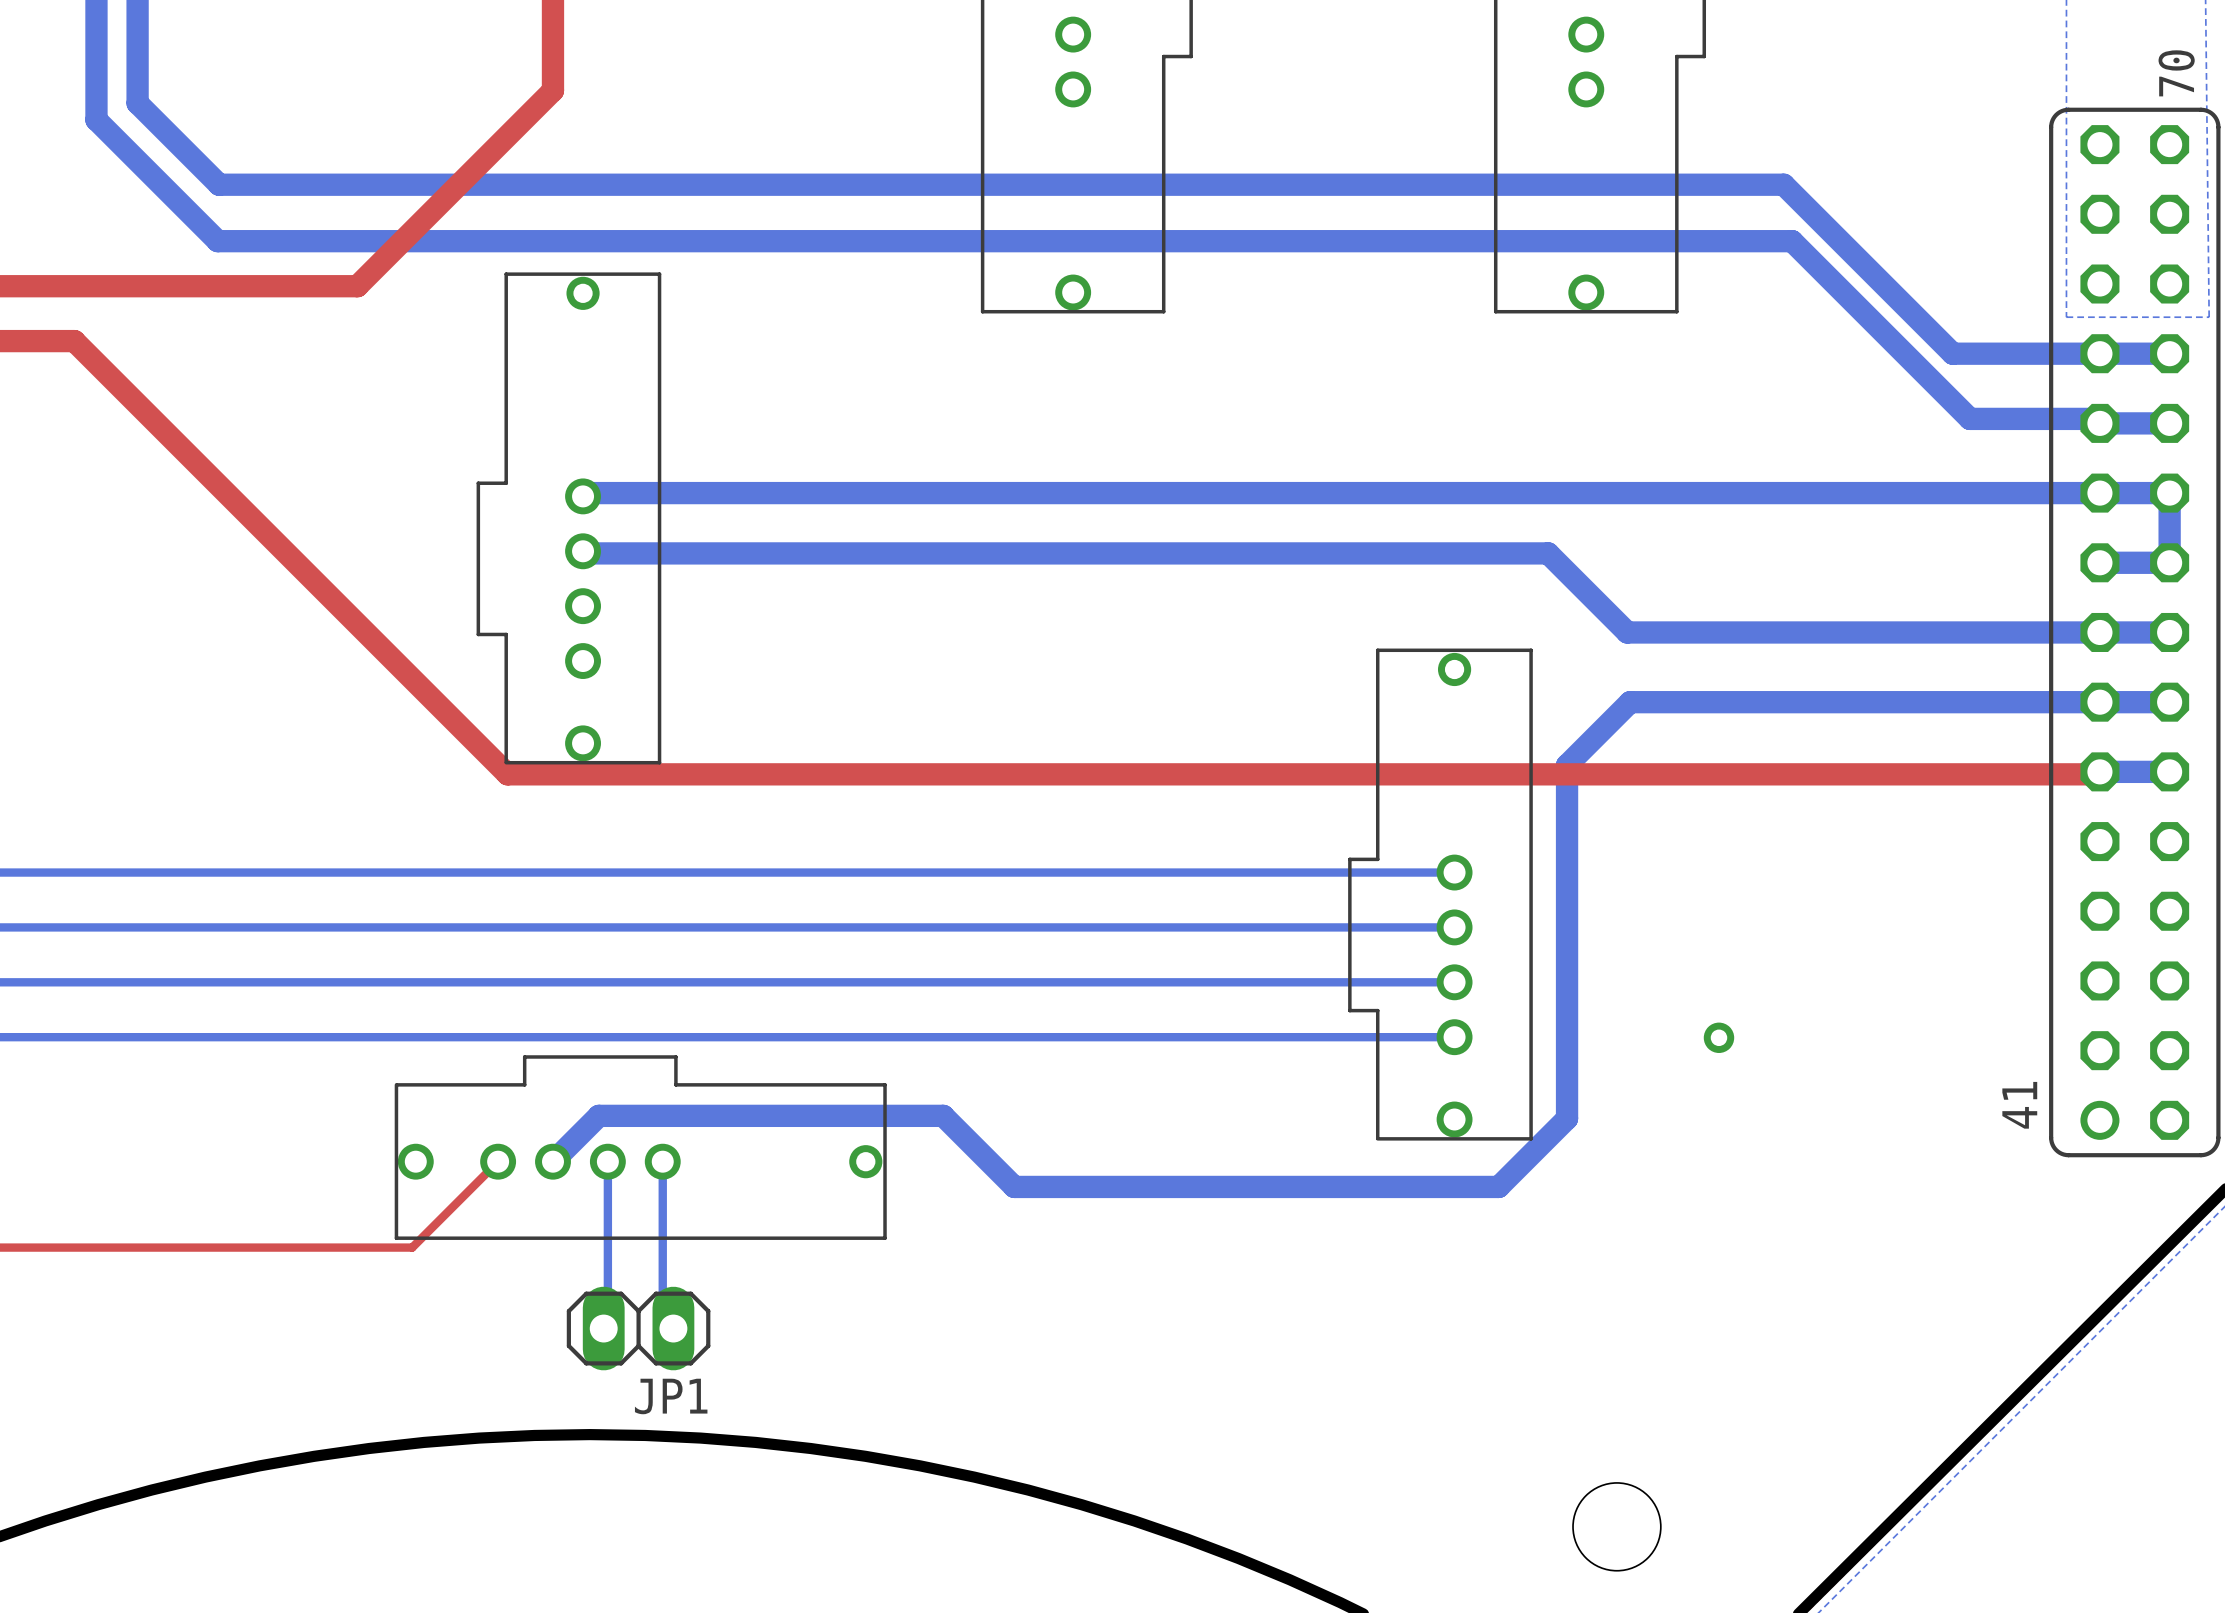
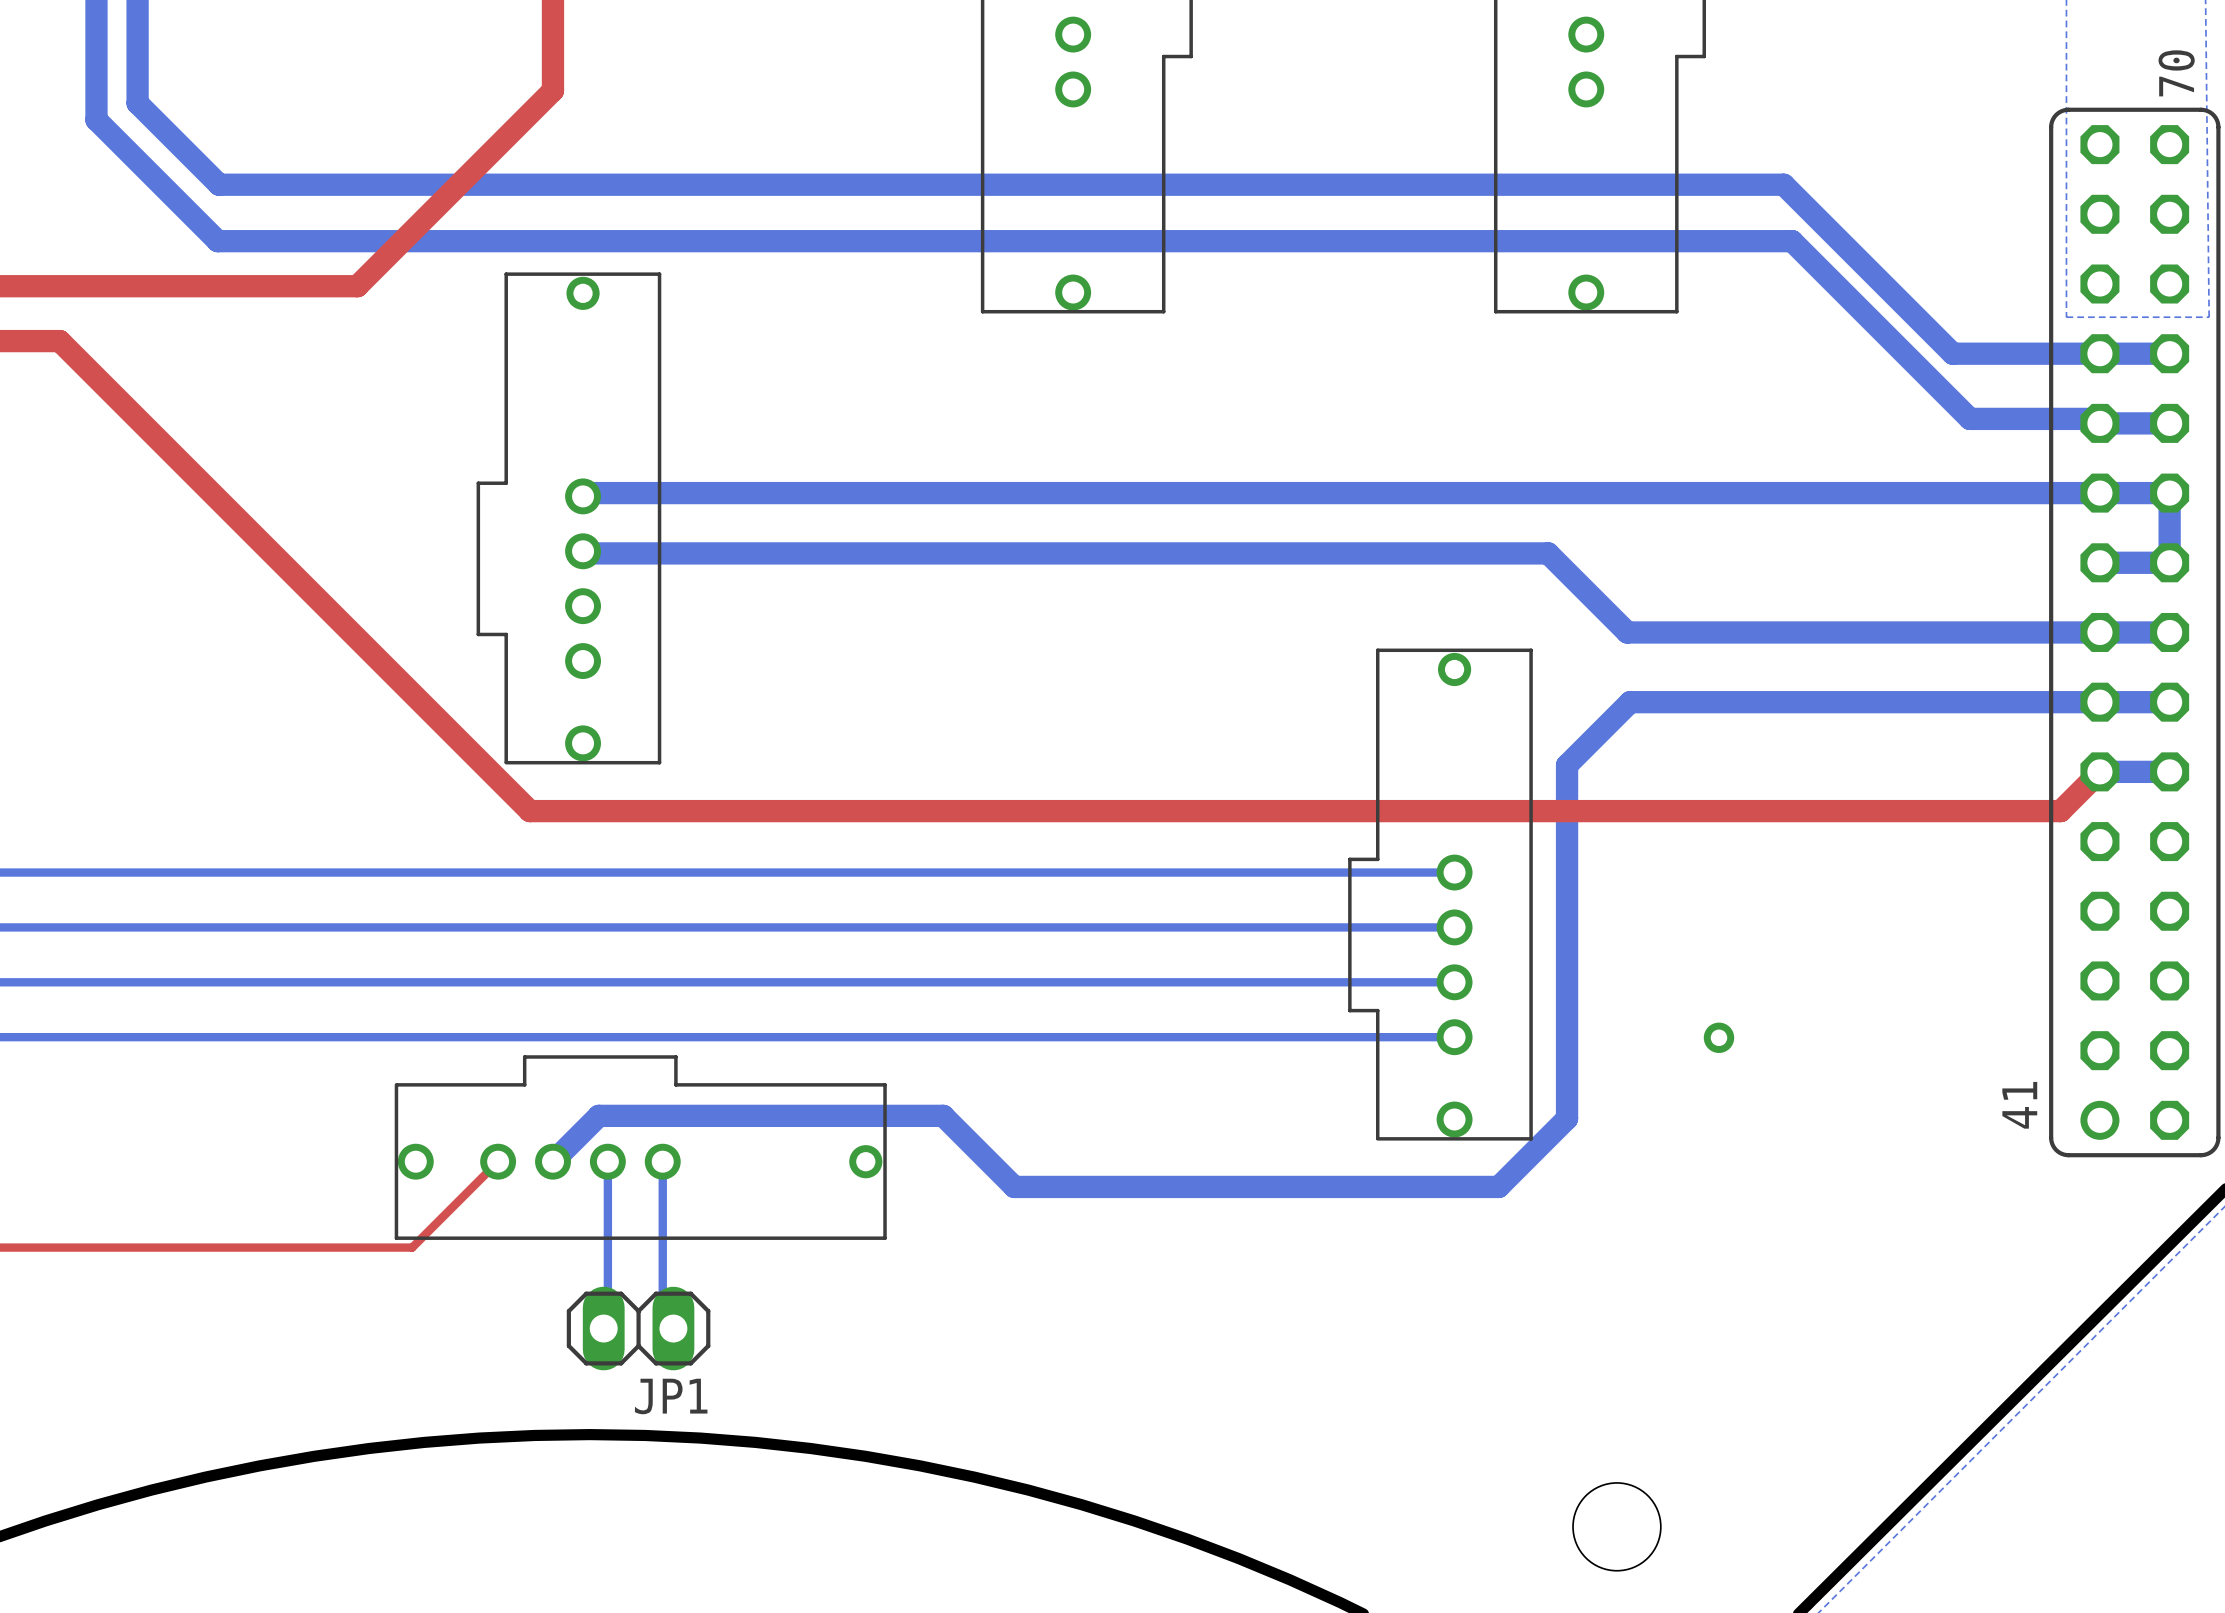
top track: (59, 341) (74, 341) (507, 774) (2097, 774) -> (59, 341) (529, 811) (2060, 811) (2097, 774)

